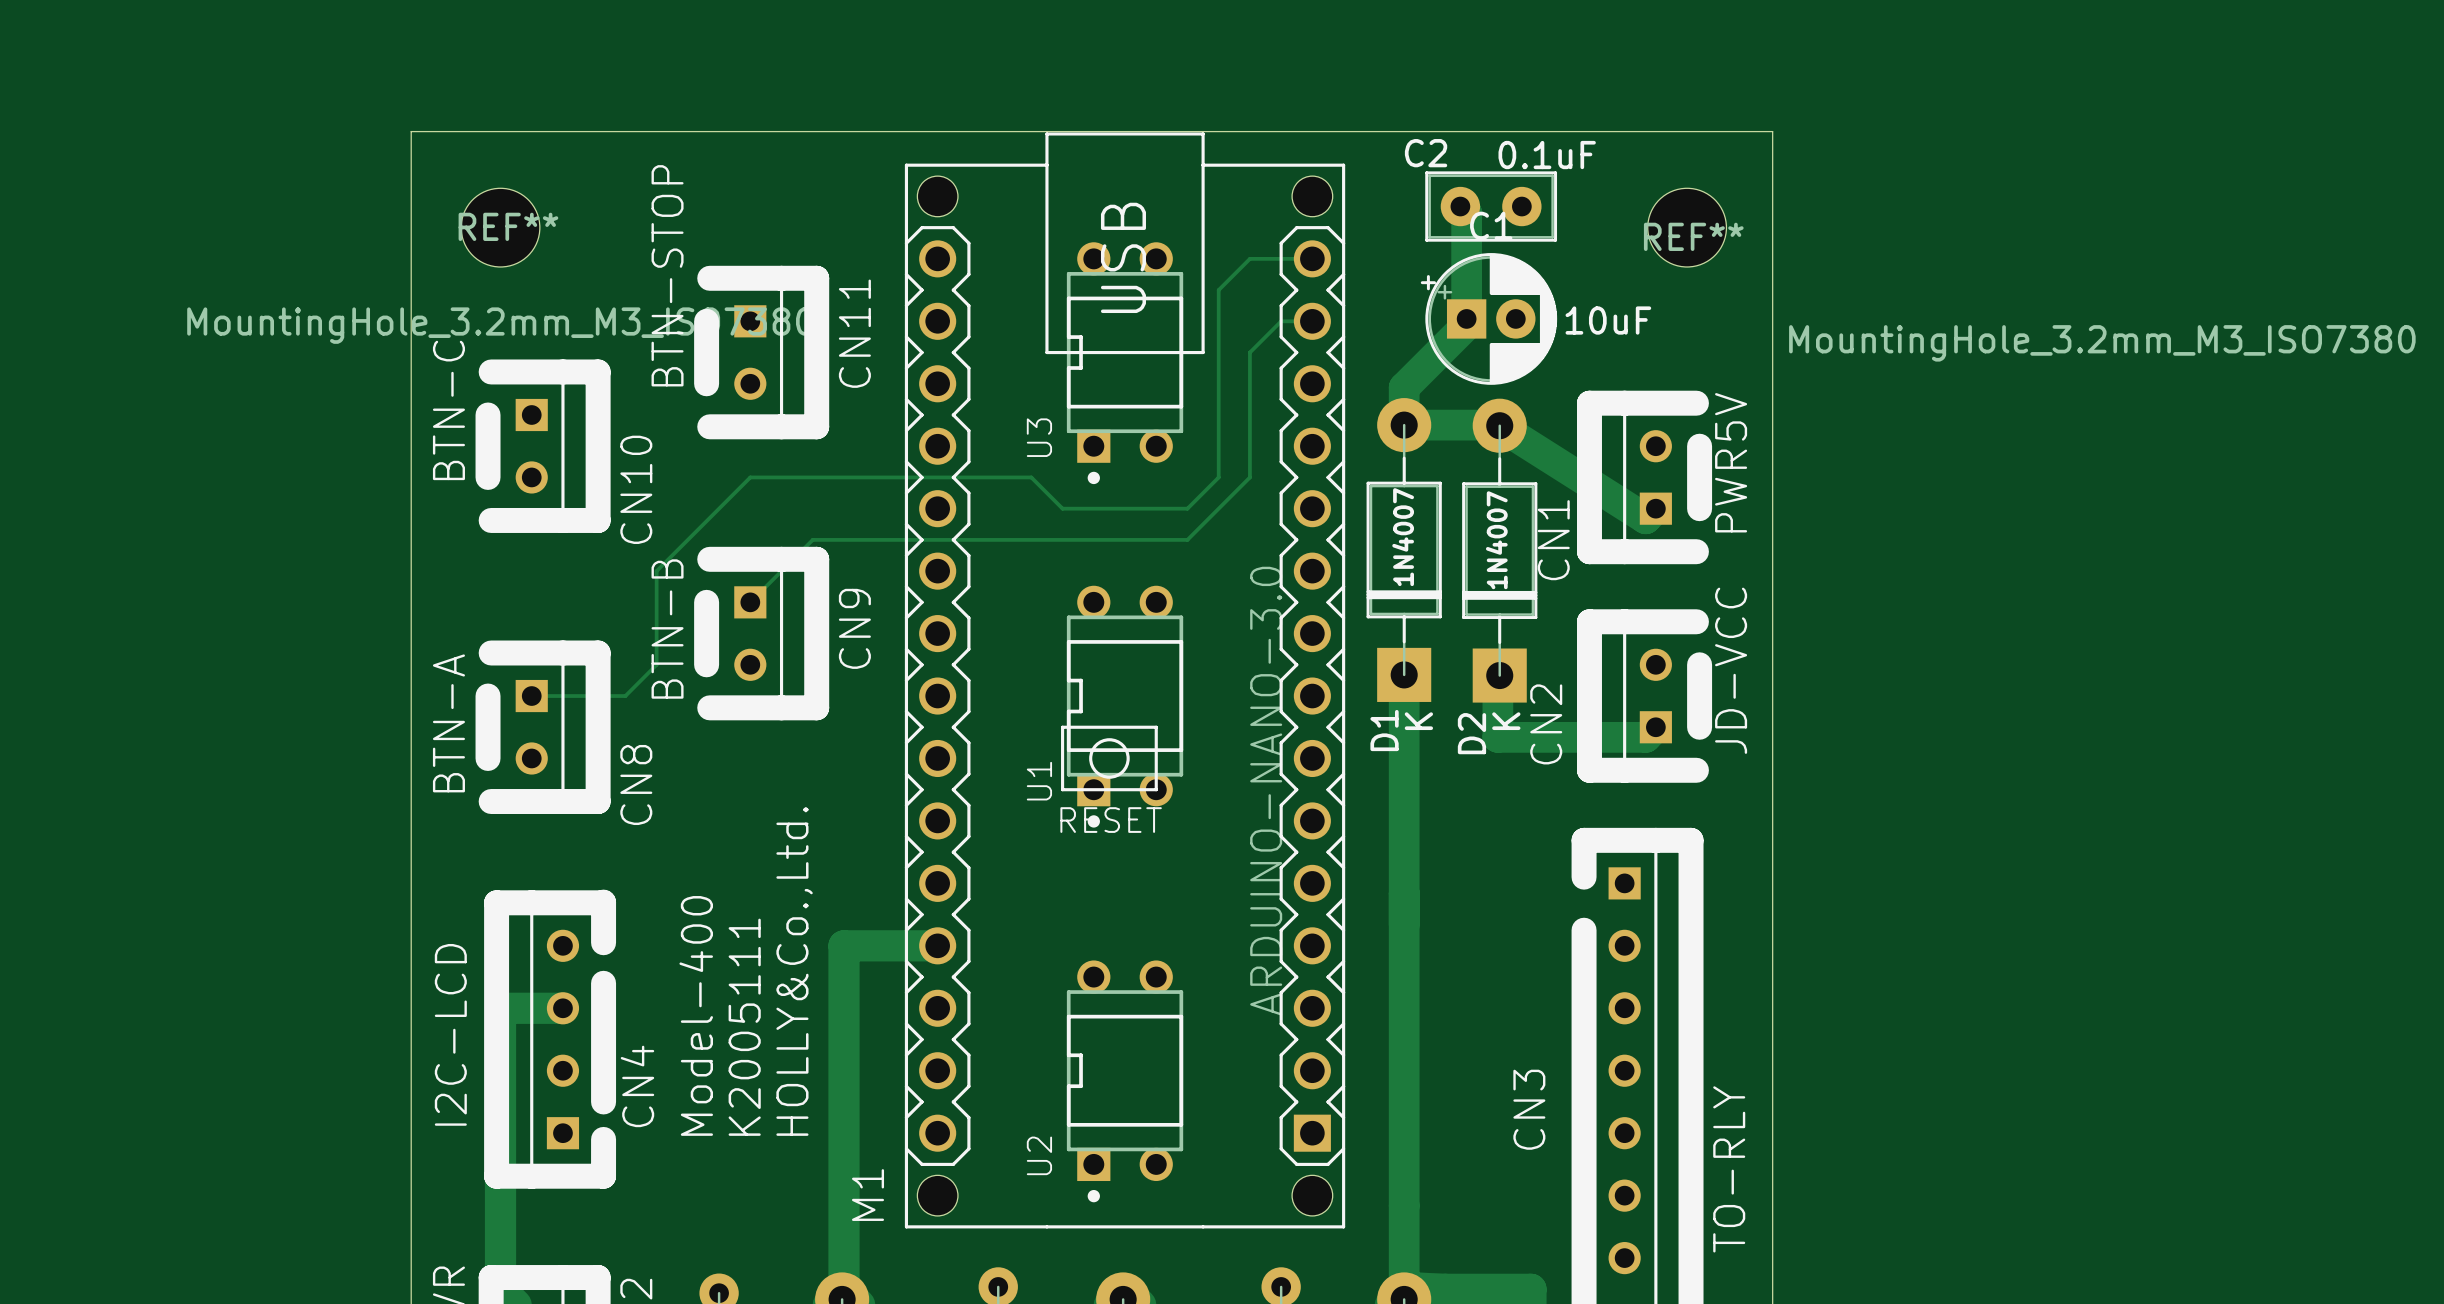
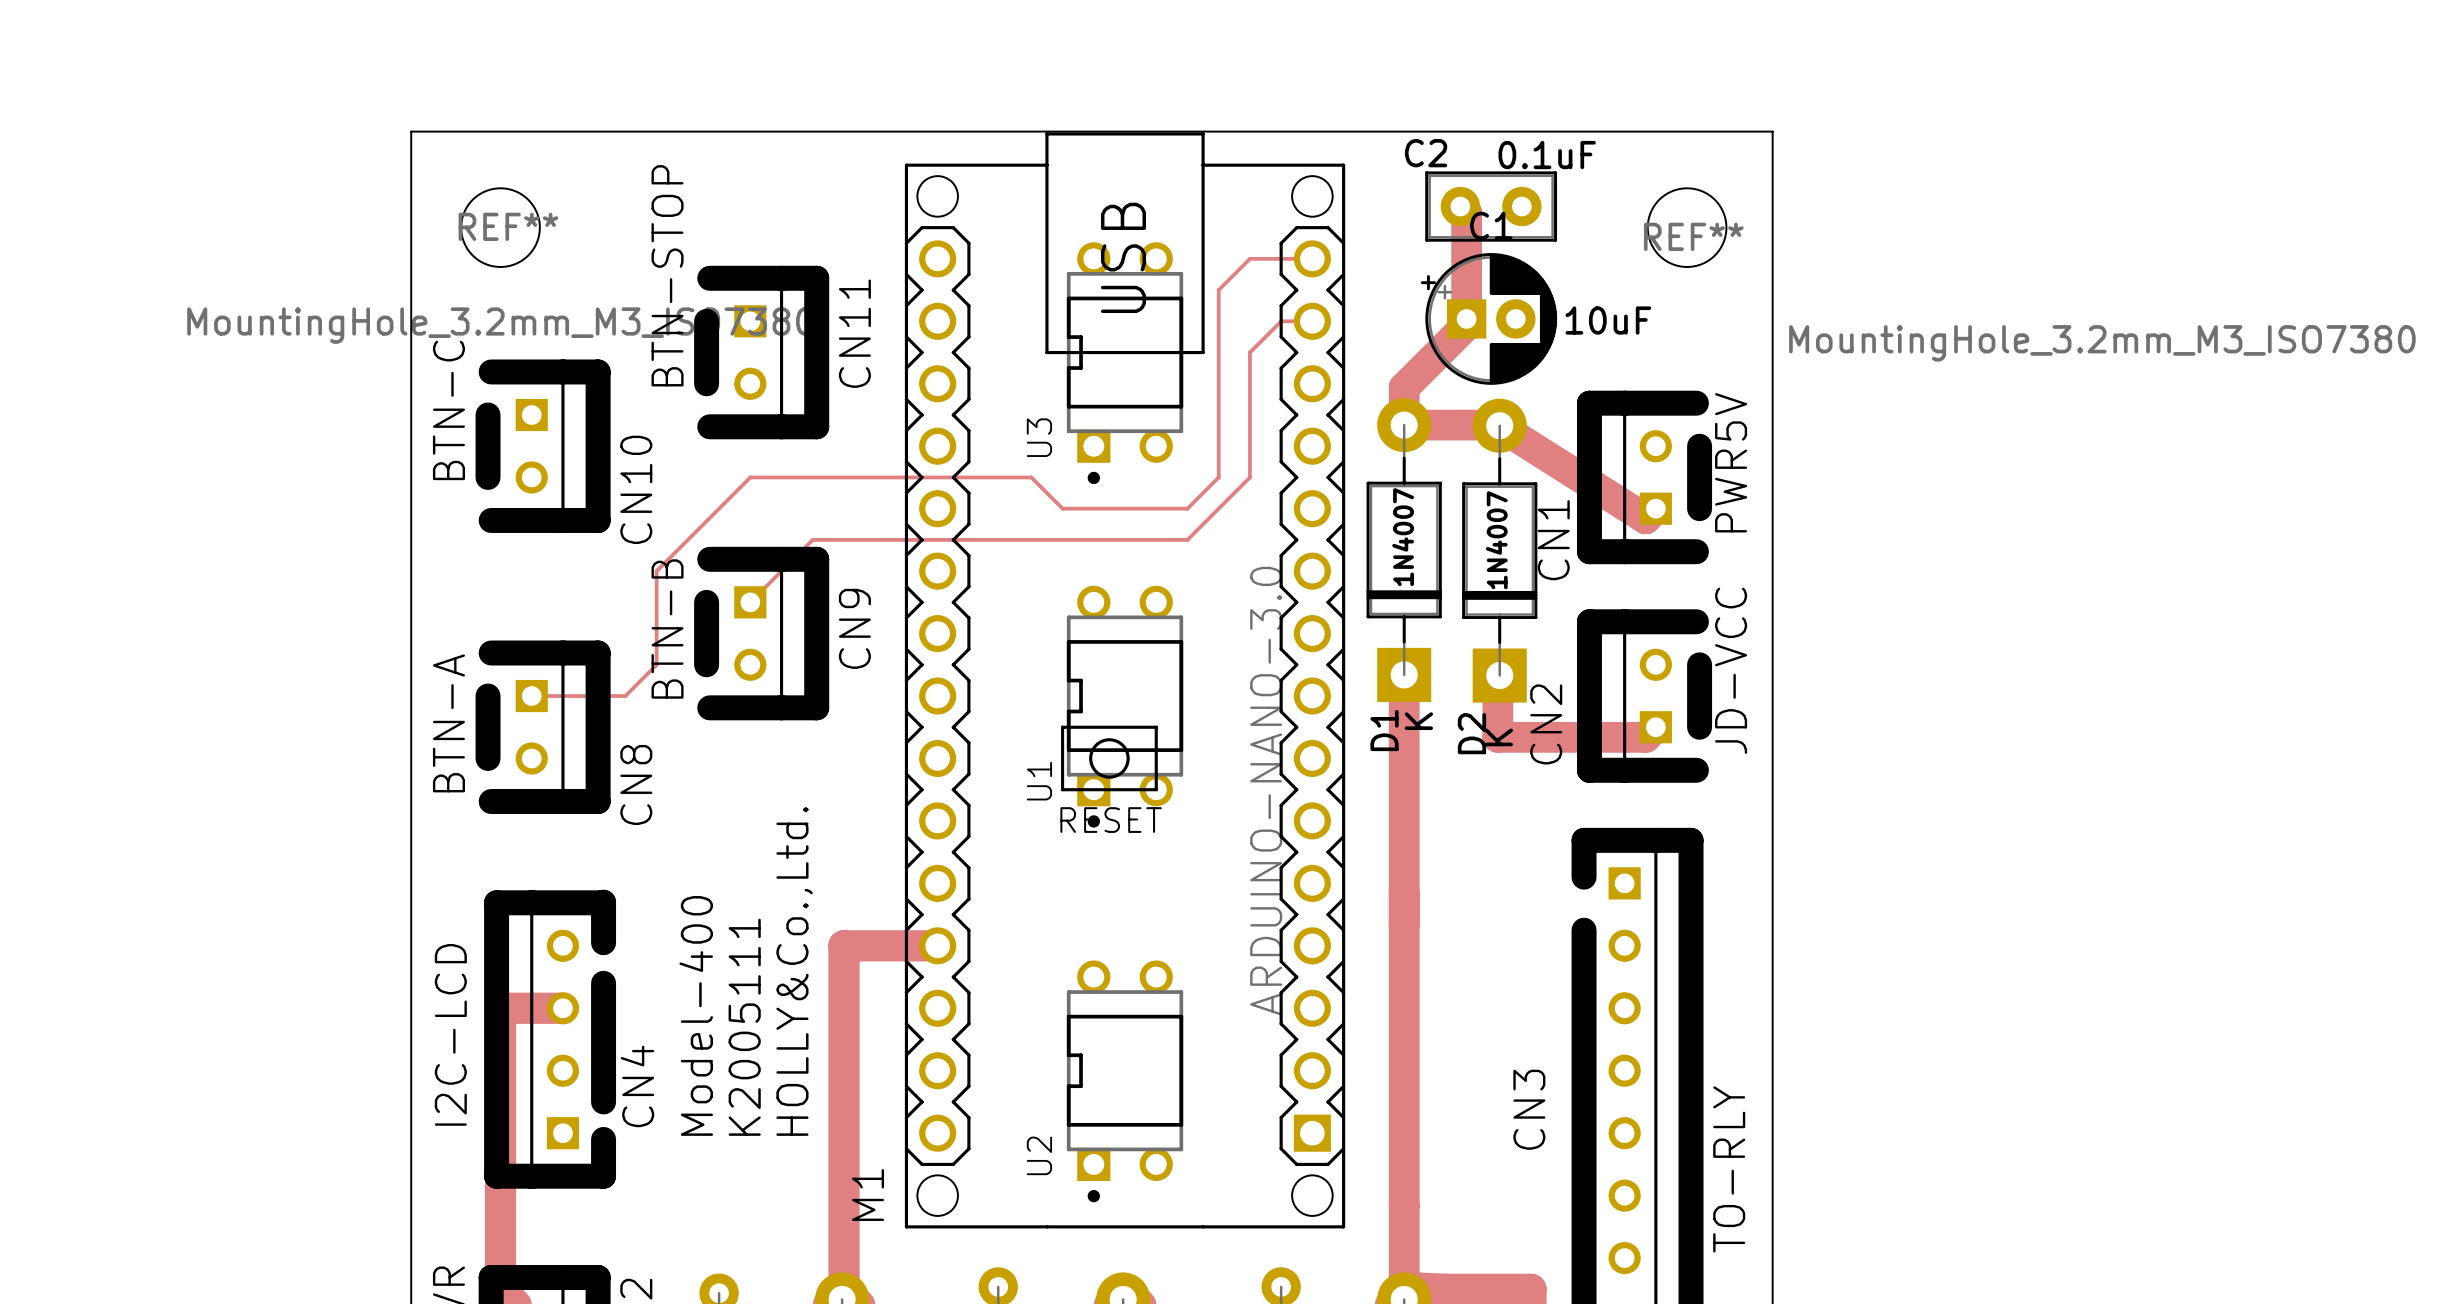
D2 text position: K (1506, 721) -> K (1498, 737)

